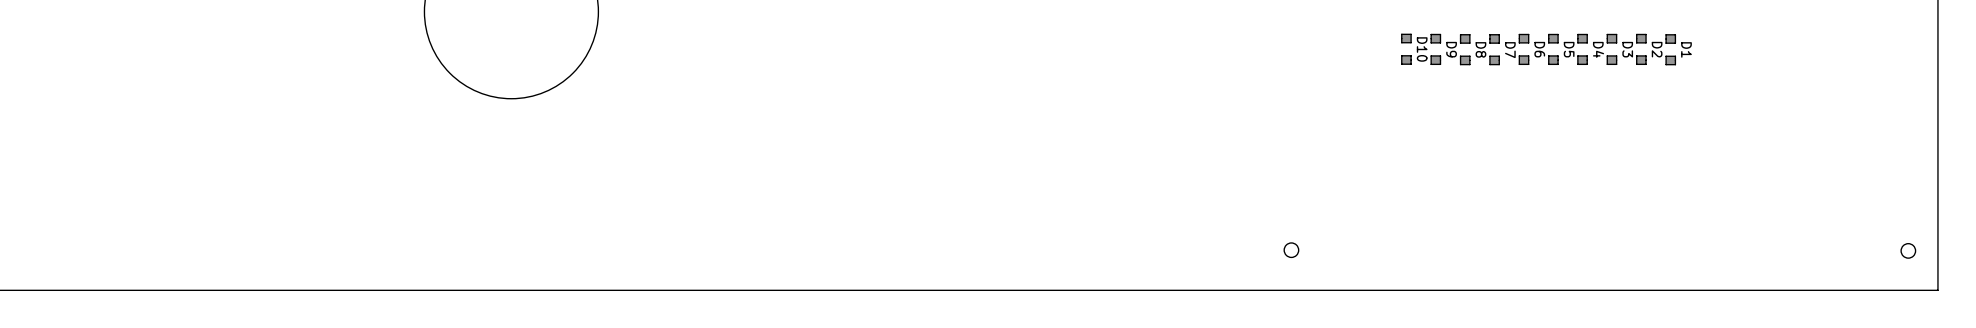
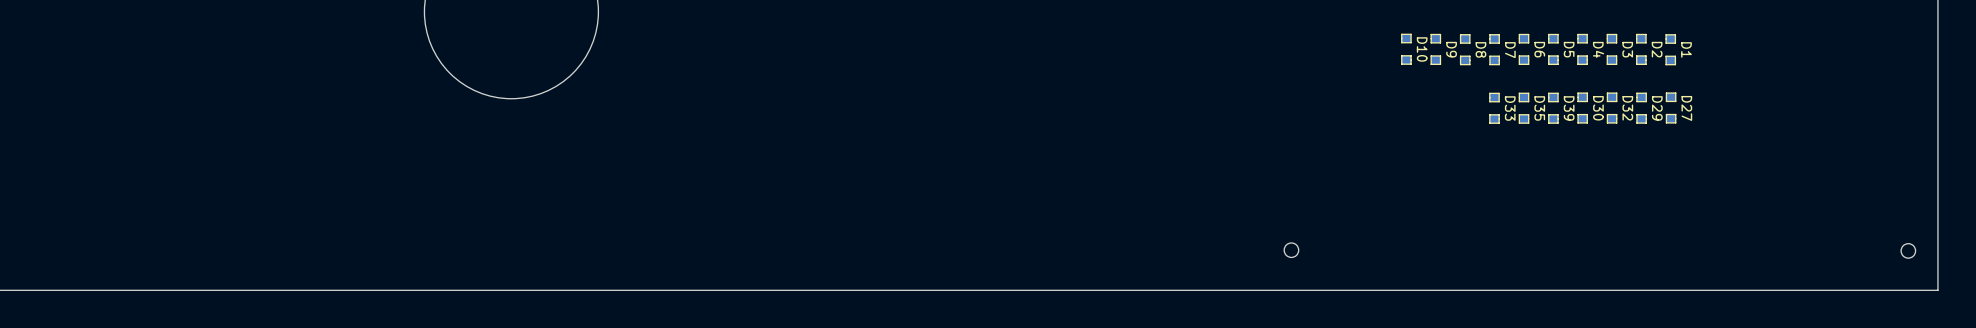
D27: none -> (1671, 107)
D33: none -> (1494, 108)
D35: none -> (1524, 108)
D39: none -> (1553, 108)
D30: none -> (1582, 108)
D32: none -> (1612, 108)
D29: none -> (1641, 108)

